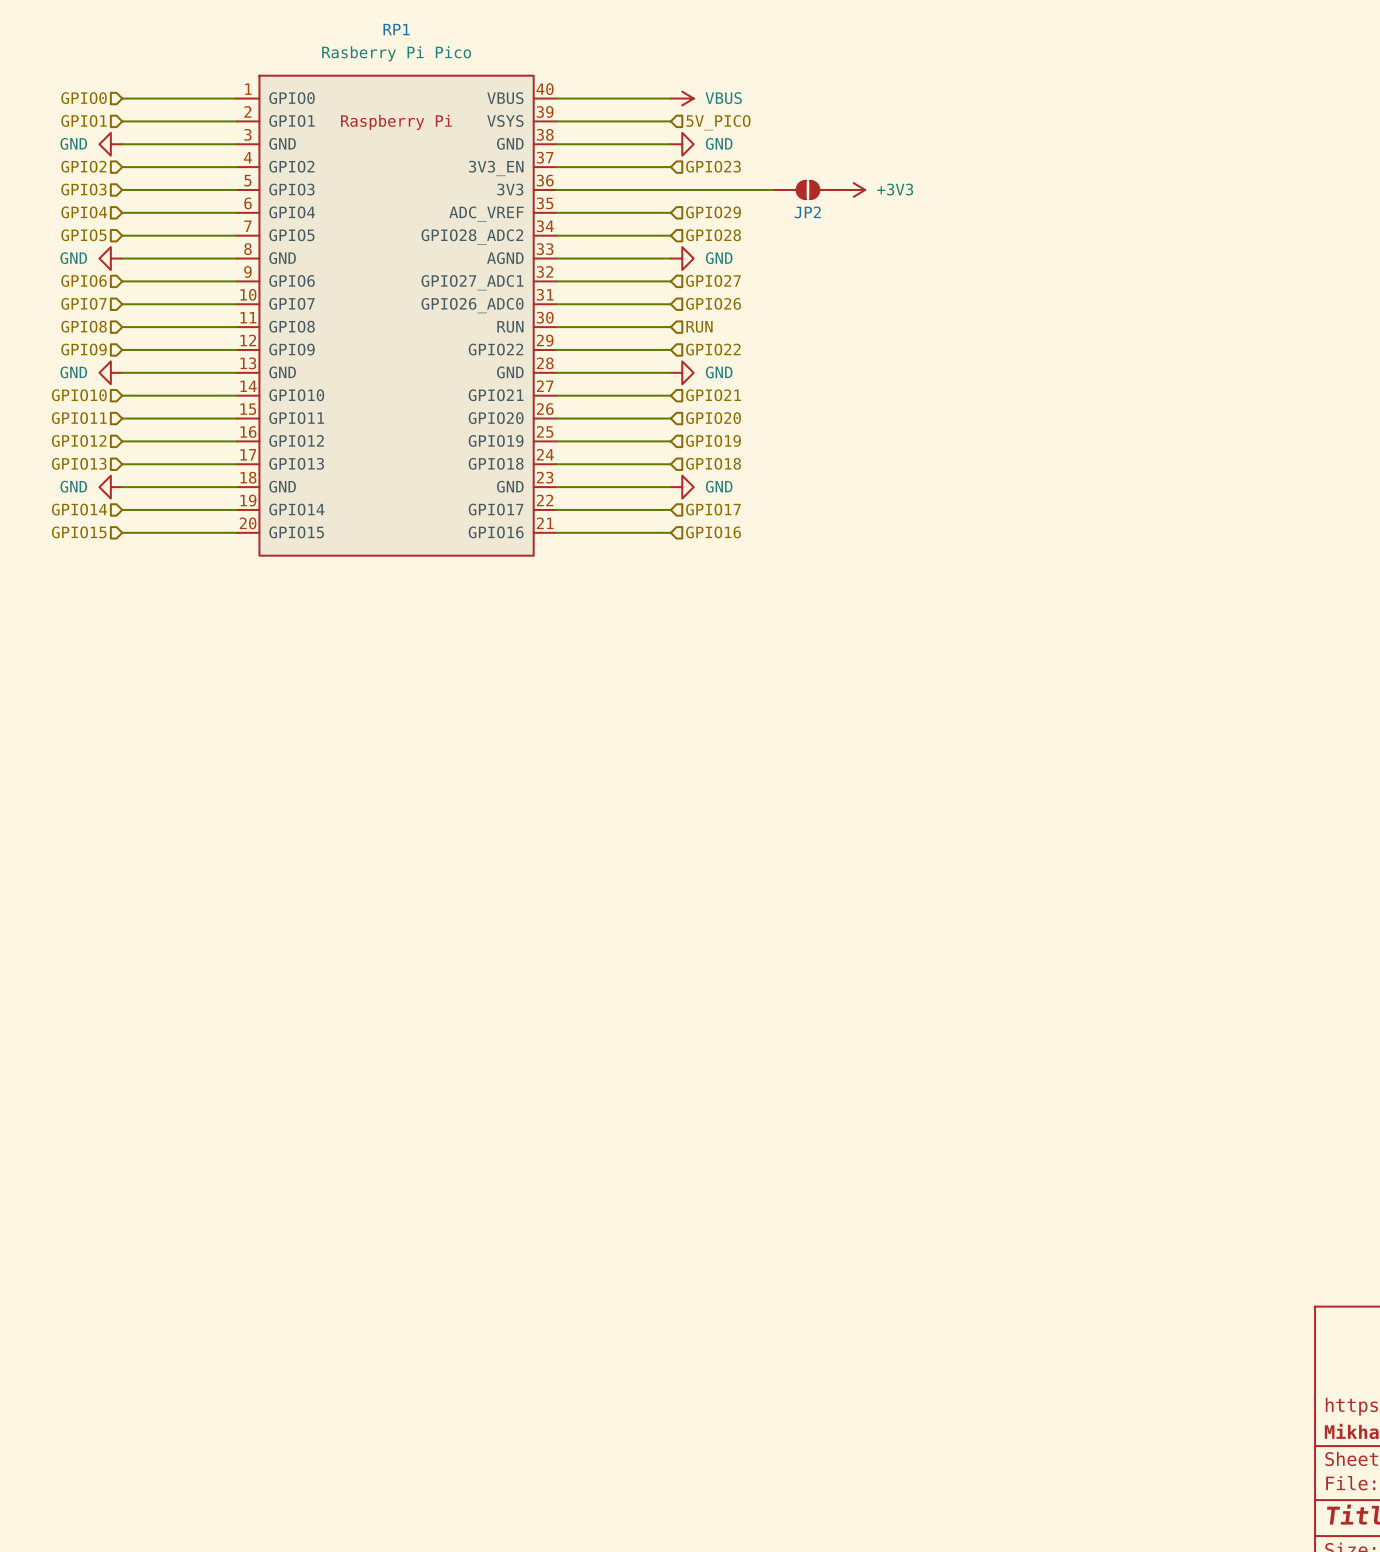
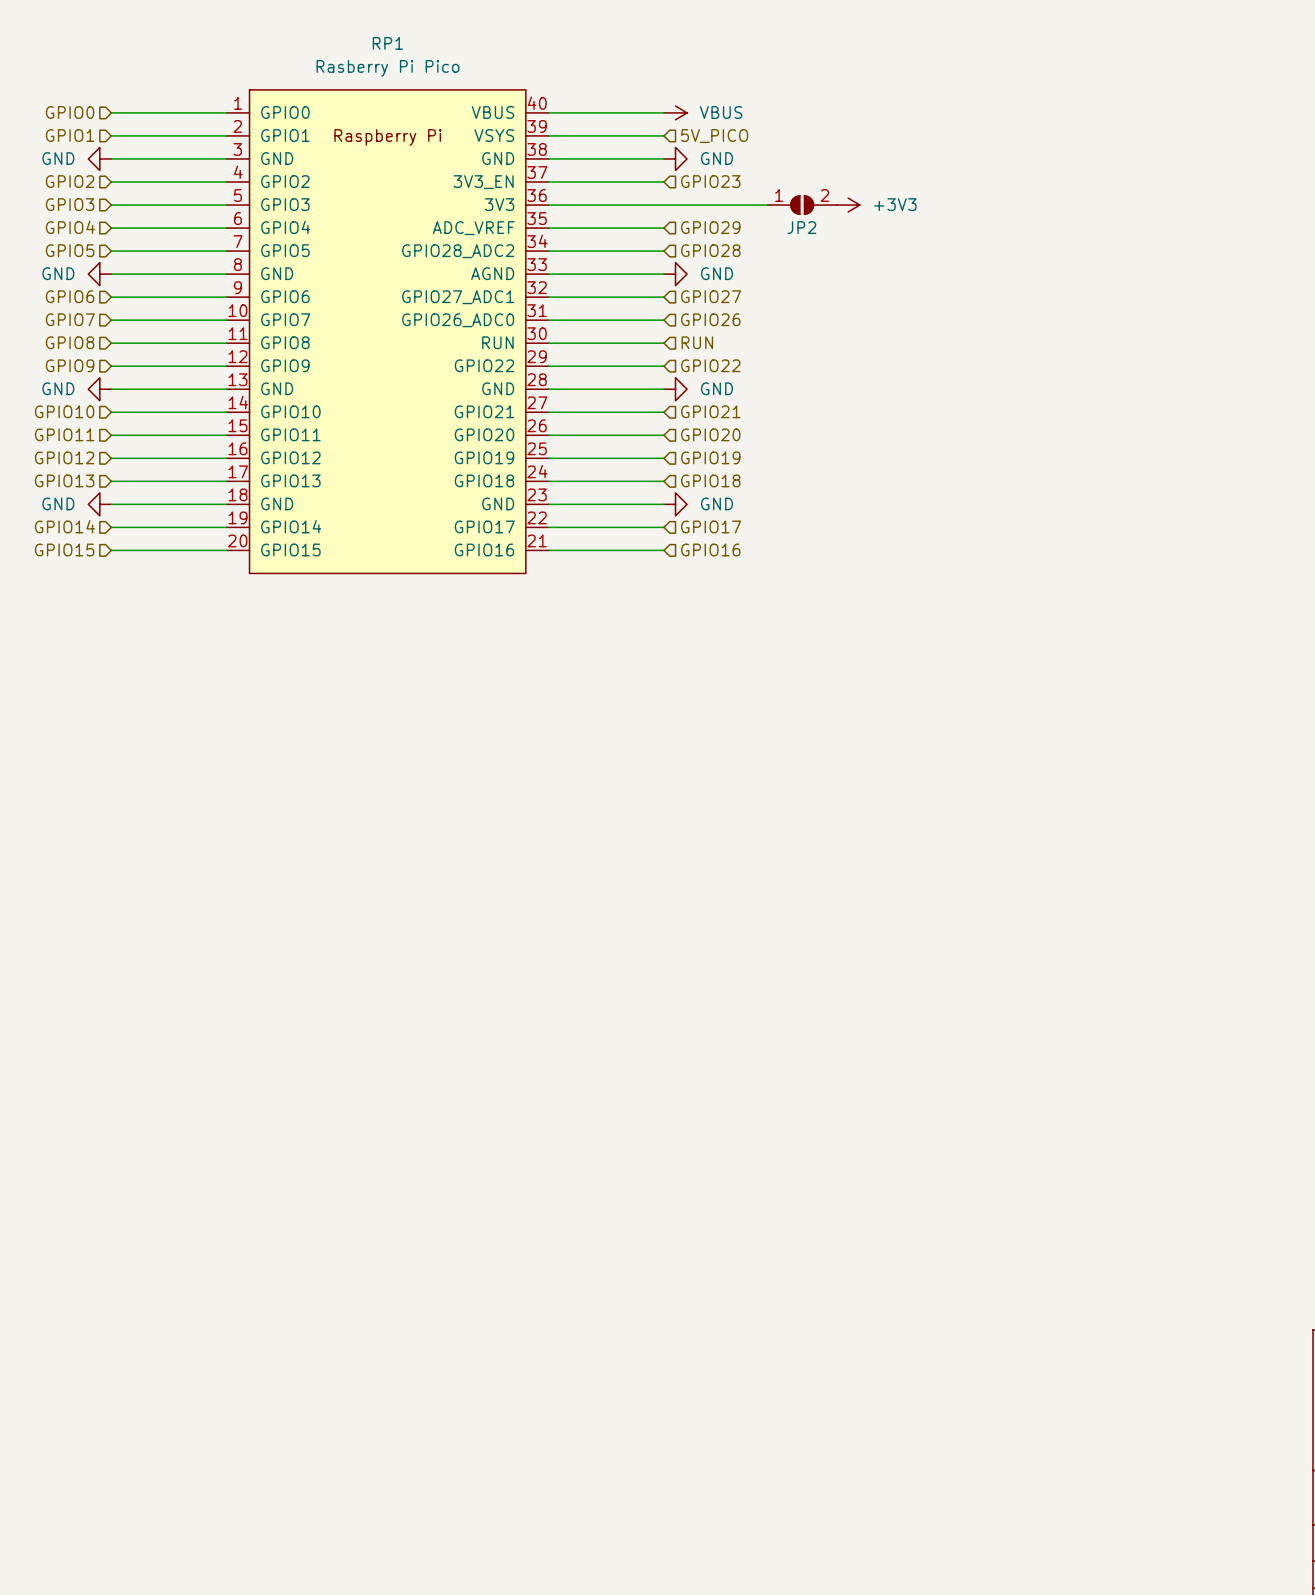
JP2 pin number: none -> 1 (779, 195)
JP2 pin number: none -> 2 (824, 195)

